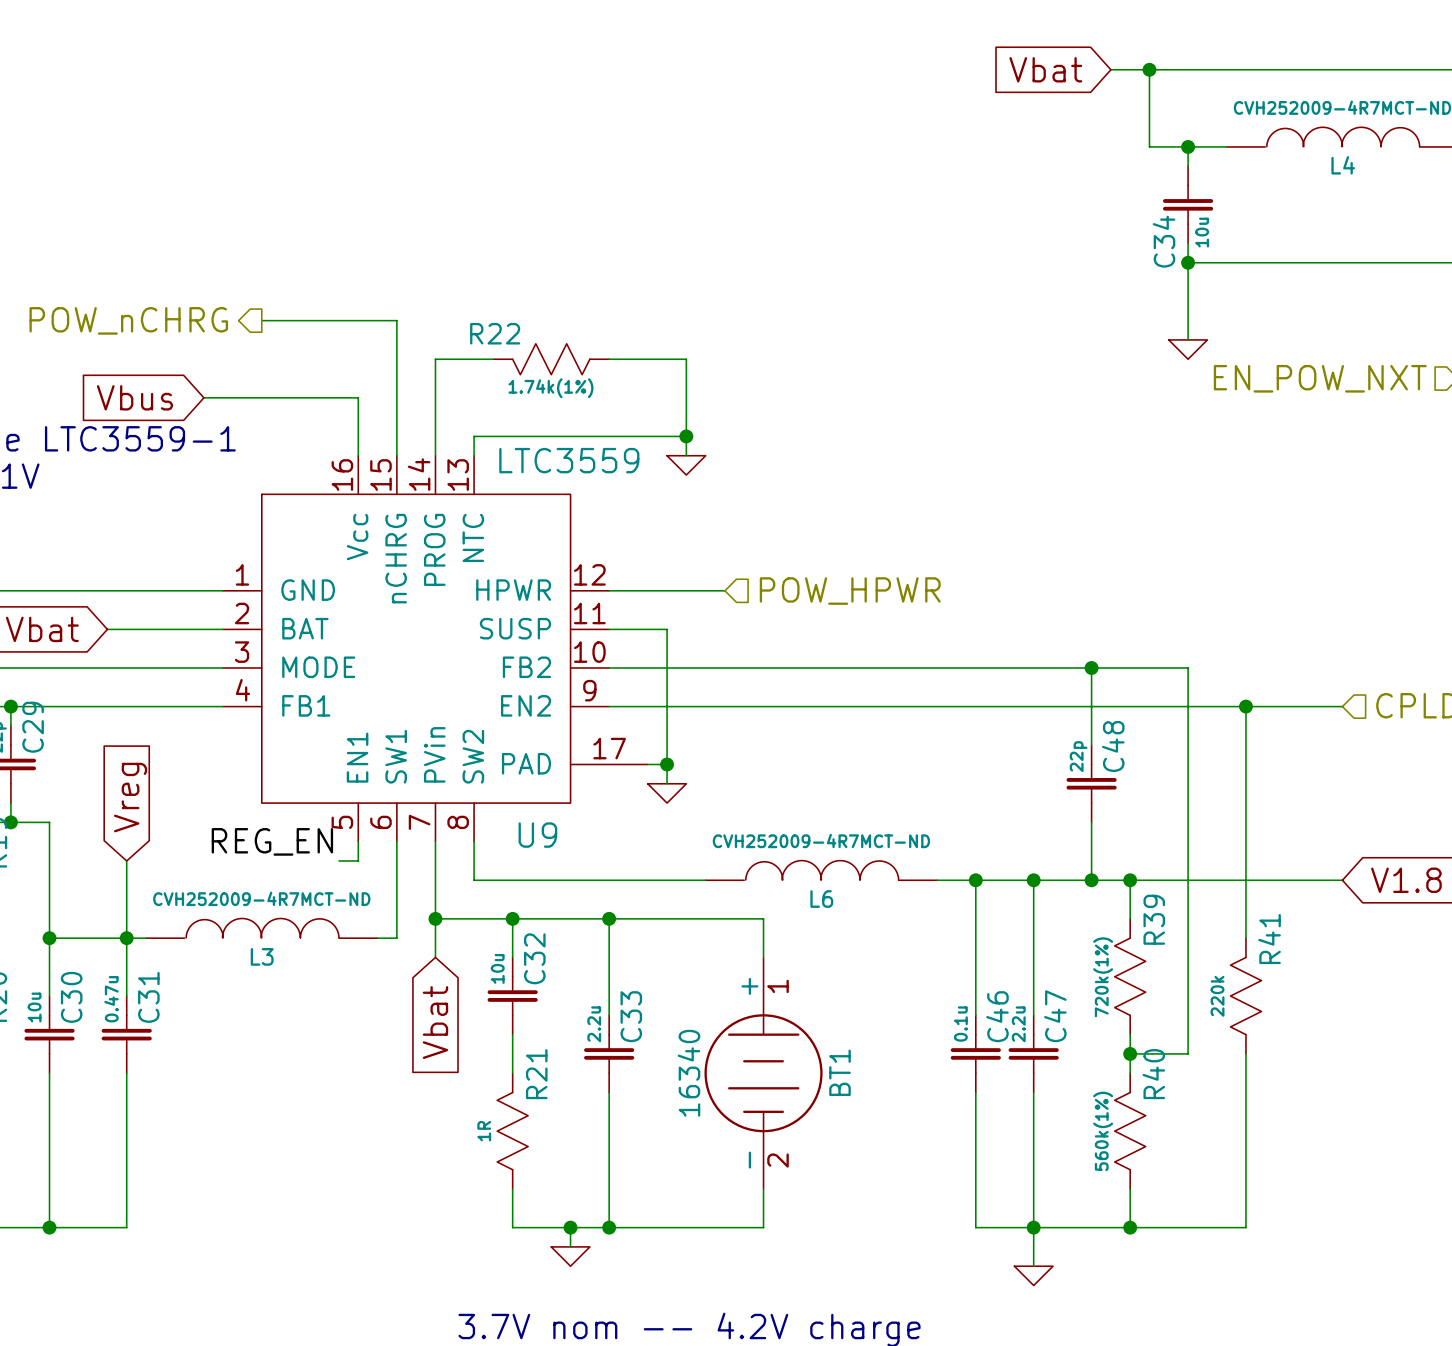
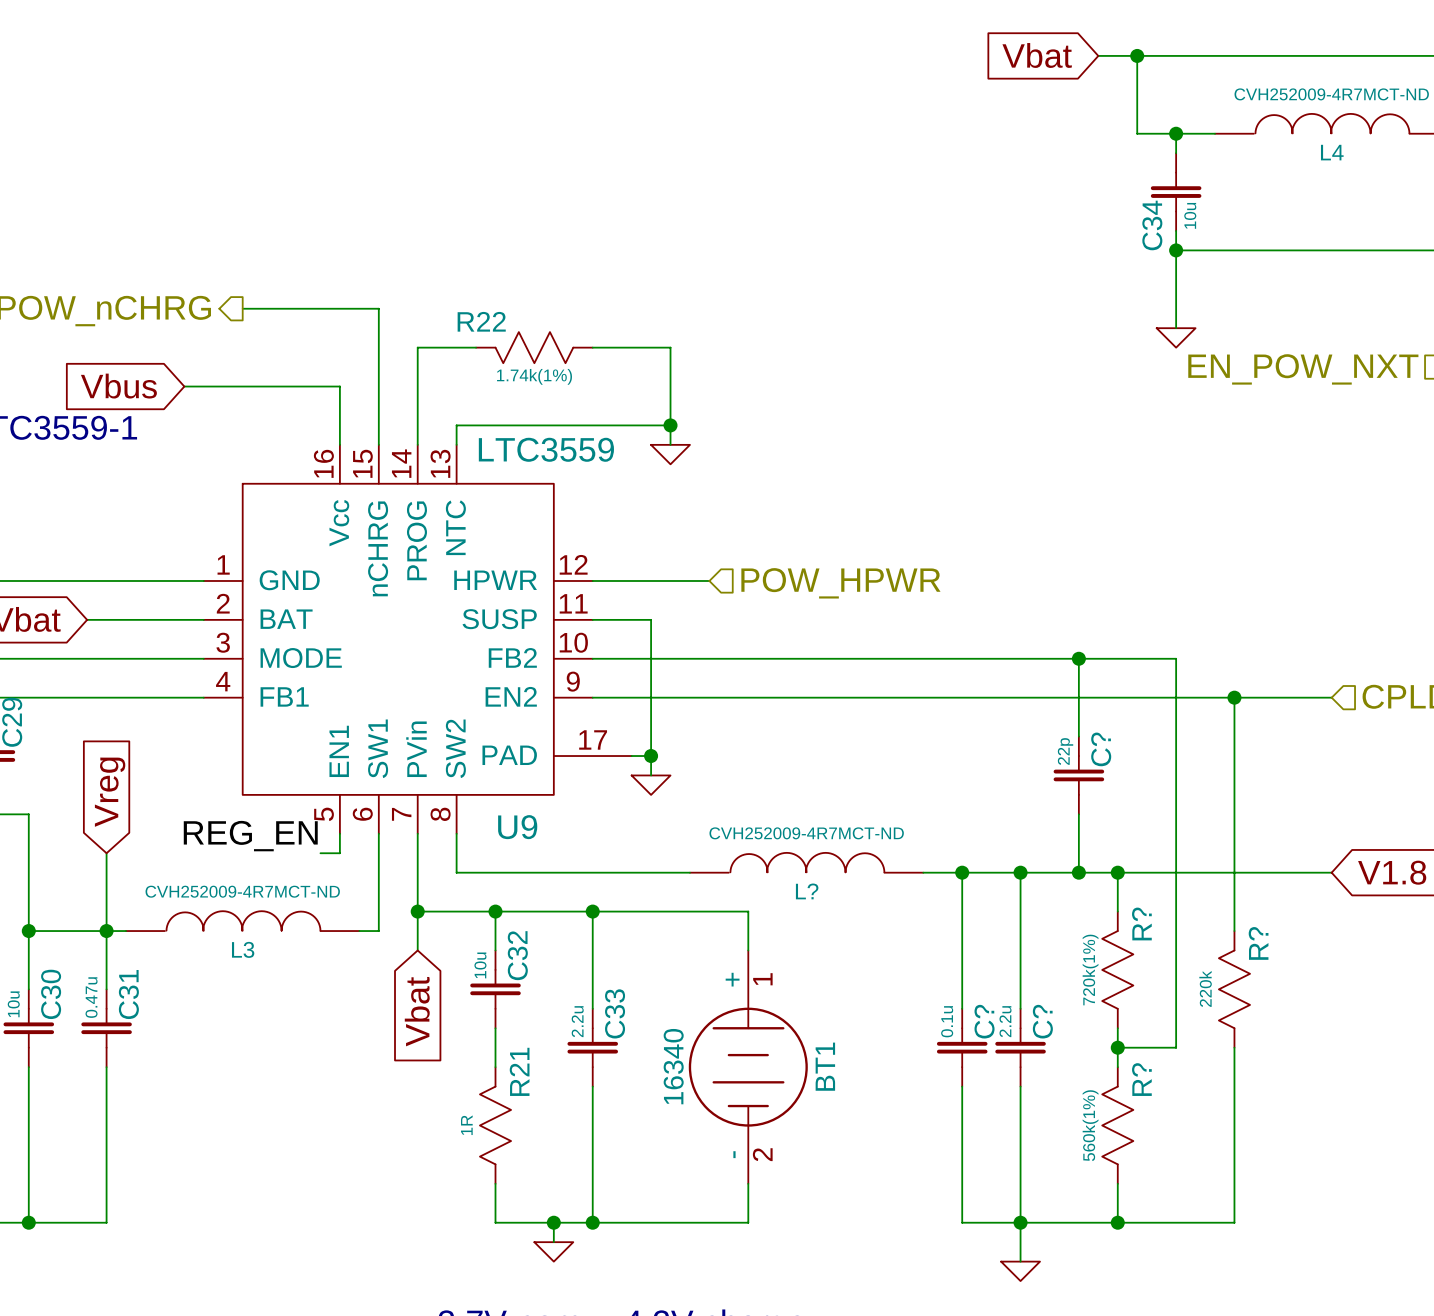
C48 name: C48 (1113, 746) -> C? (1101, 749)
L6 name: L6 (821, 898) -> L? (807, 891)
R39 name: R39 (1154, 919) -> R? (1141, 923)
R41 name: R41 (1269, 939) -> R? (1258, 943)
C46 name: C46 (997, 1016) -> C? (984, 1021)
C47 name: C47 (1055, 1016) -> C? (1042, 1021)
R40 name: R40 (1153, 1074) -> R? (1141, 1079)

